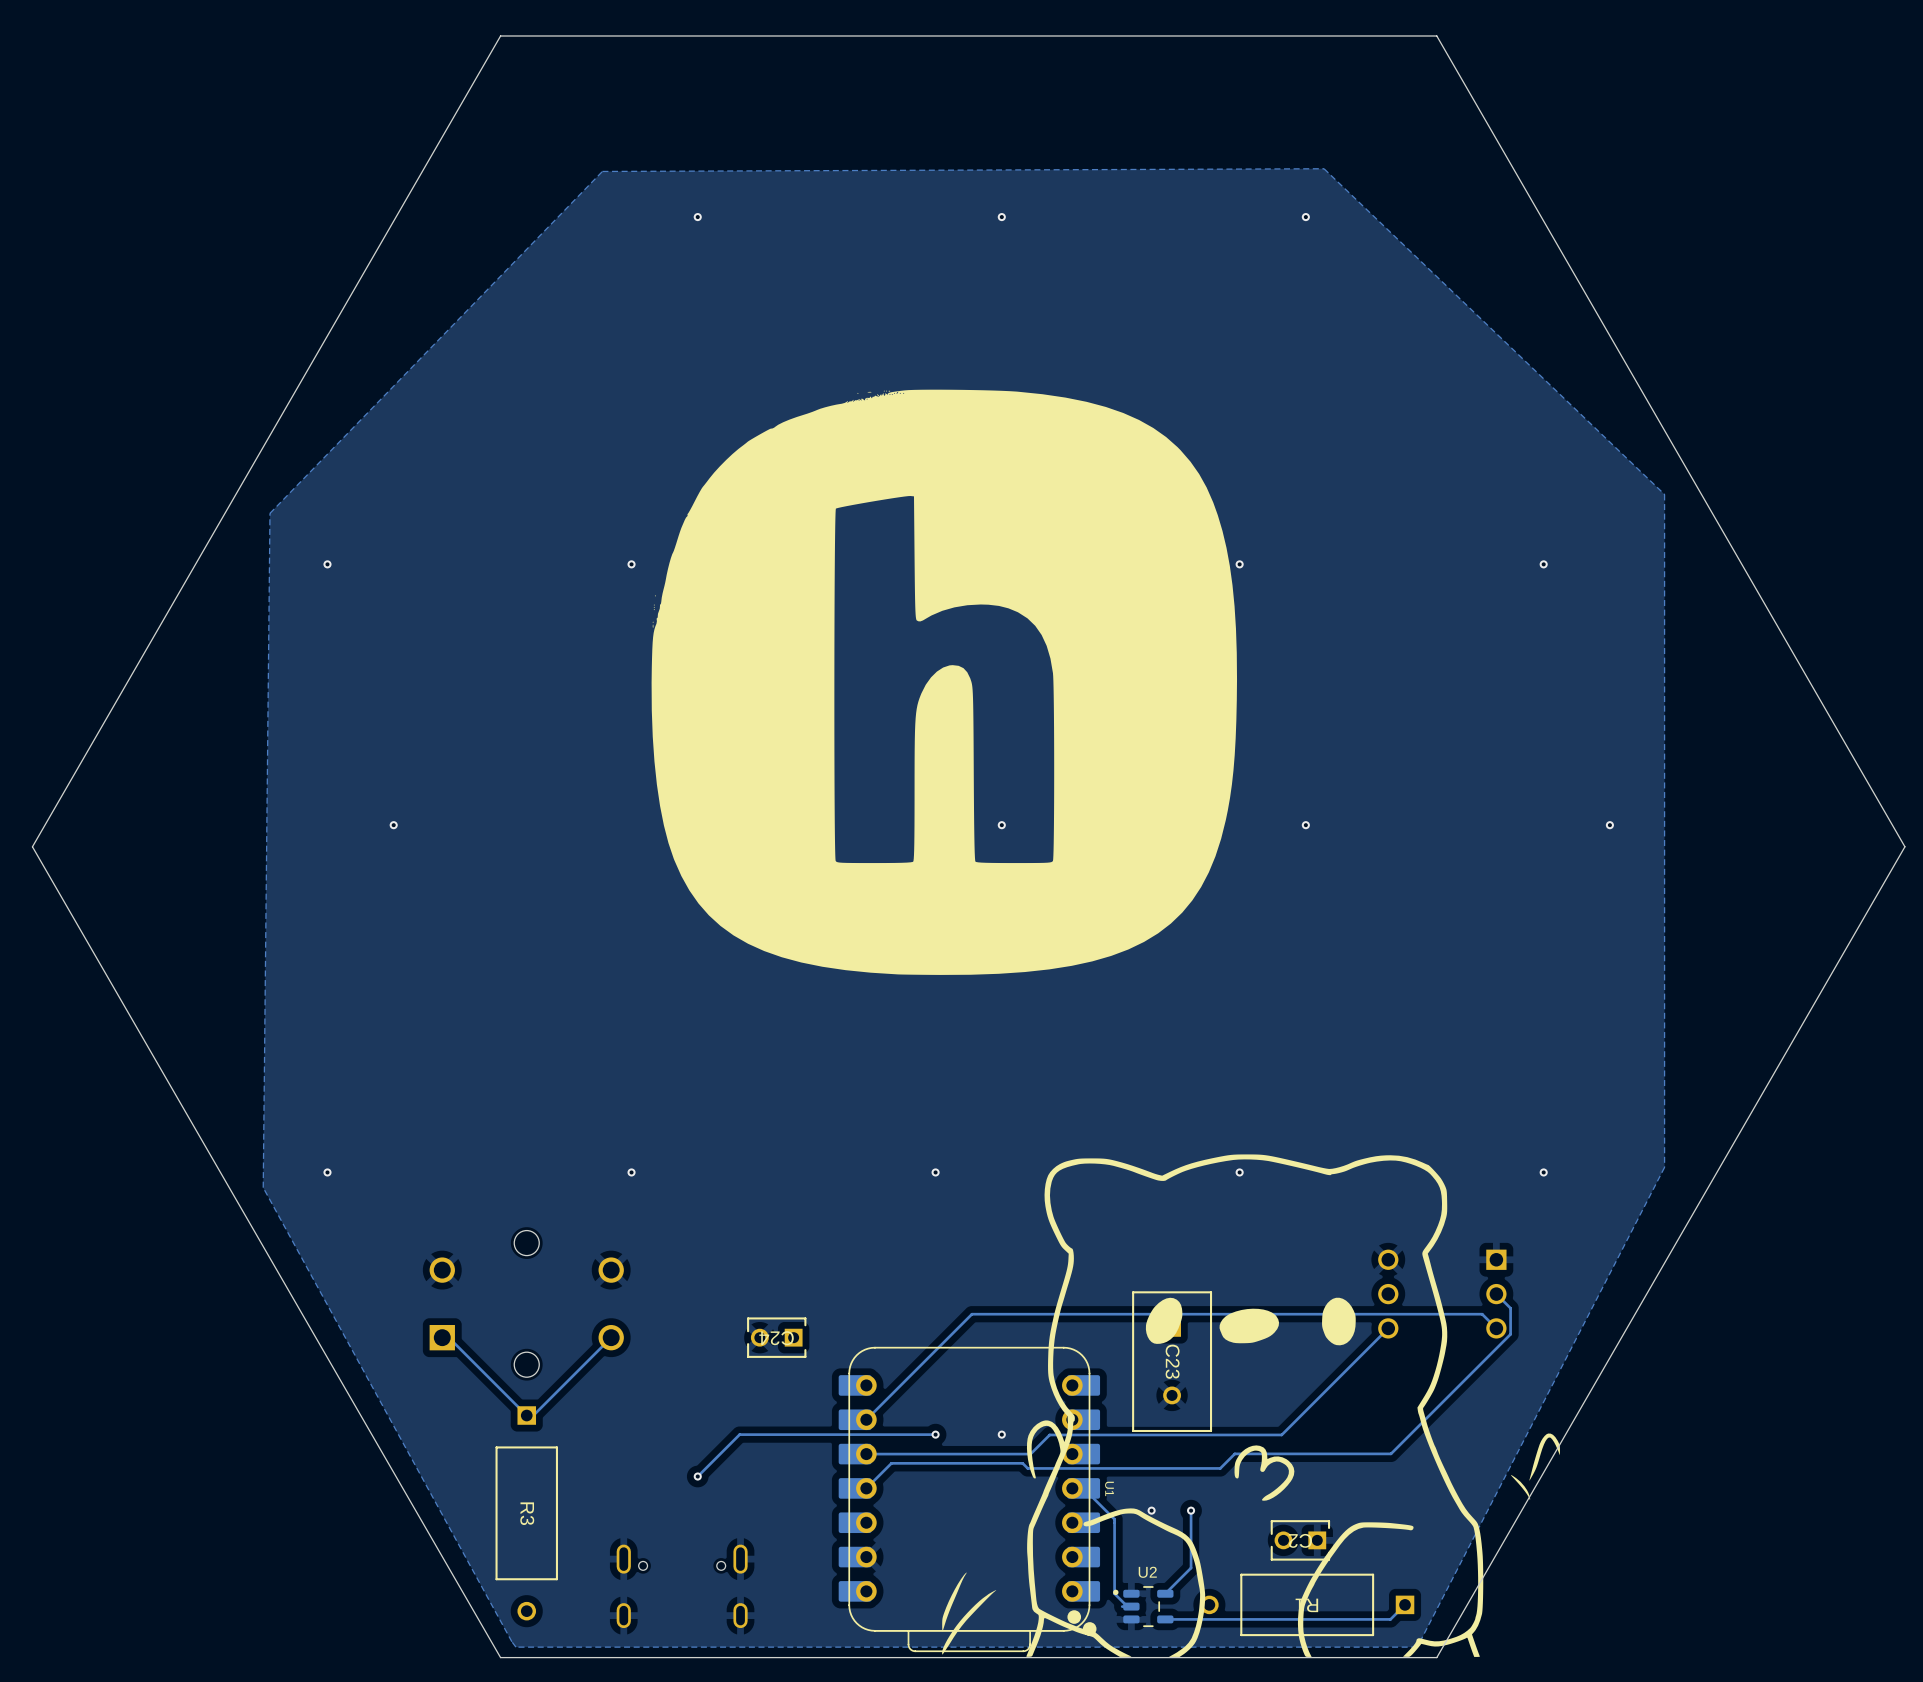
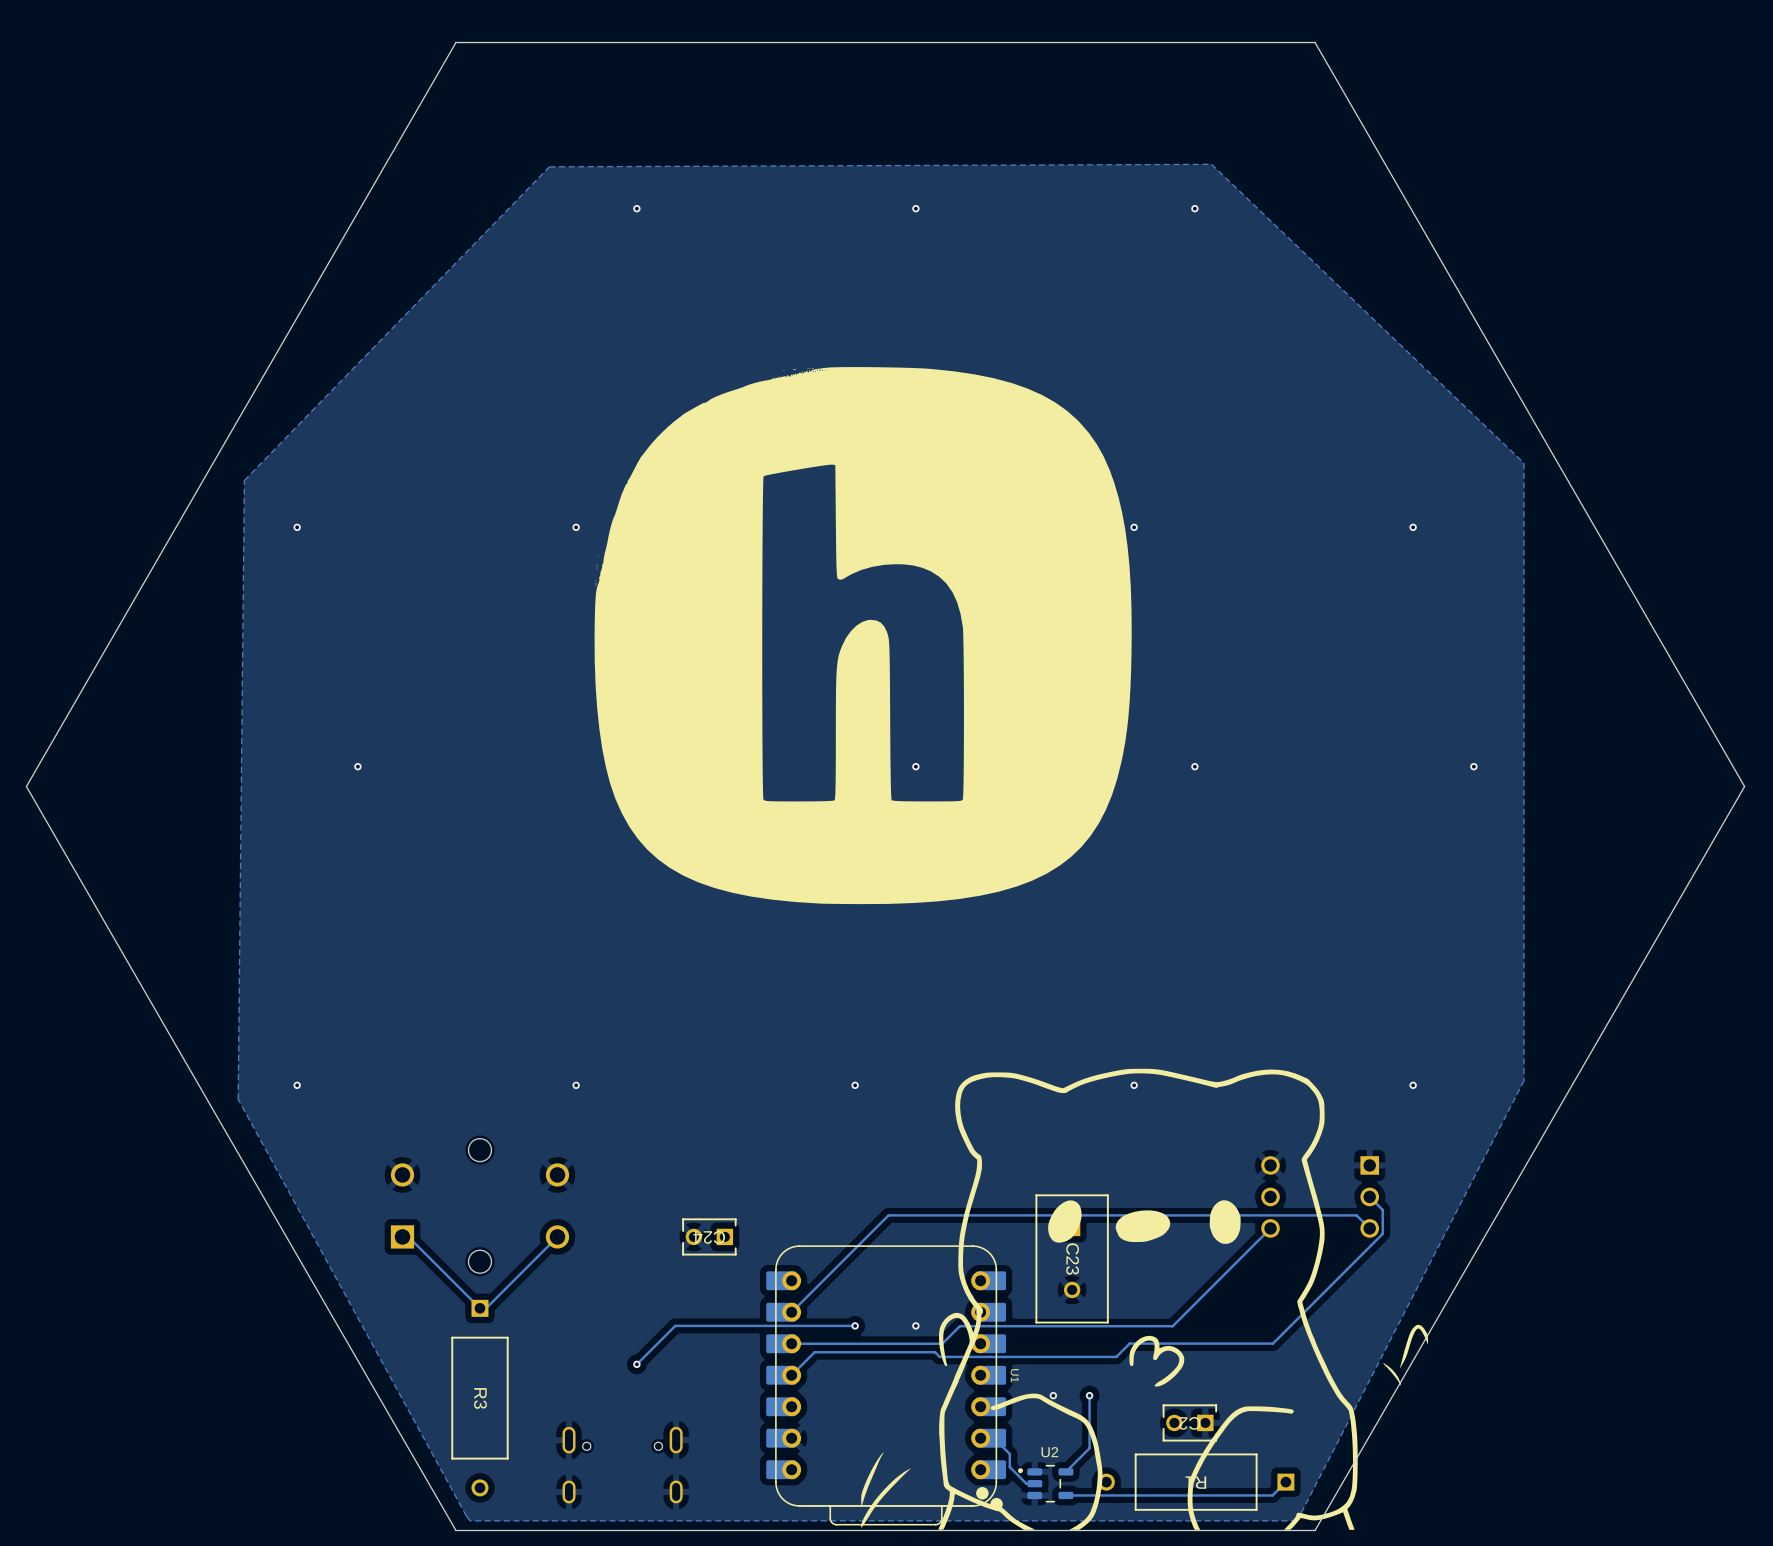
track: (1072, 1488) (1083, 1488) (1114, 1519) (1114, 1593) (1127, 1606) -> none
track: none -> (980, 1438) (993, 1438) (1009, 1454) (1009, 1467) (1026, 1483)

